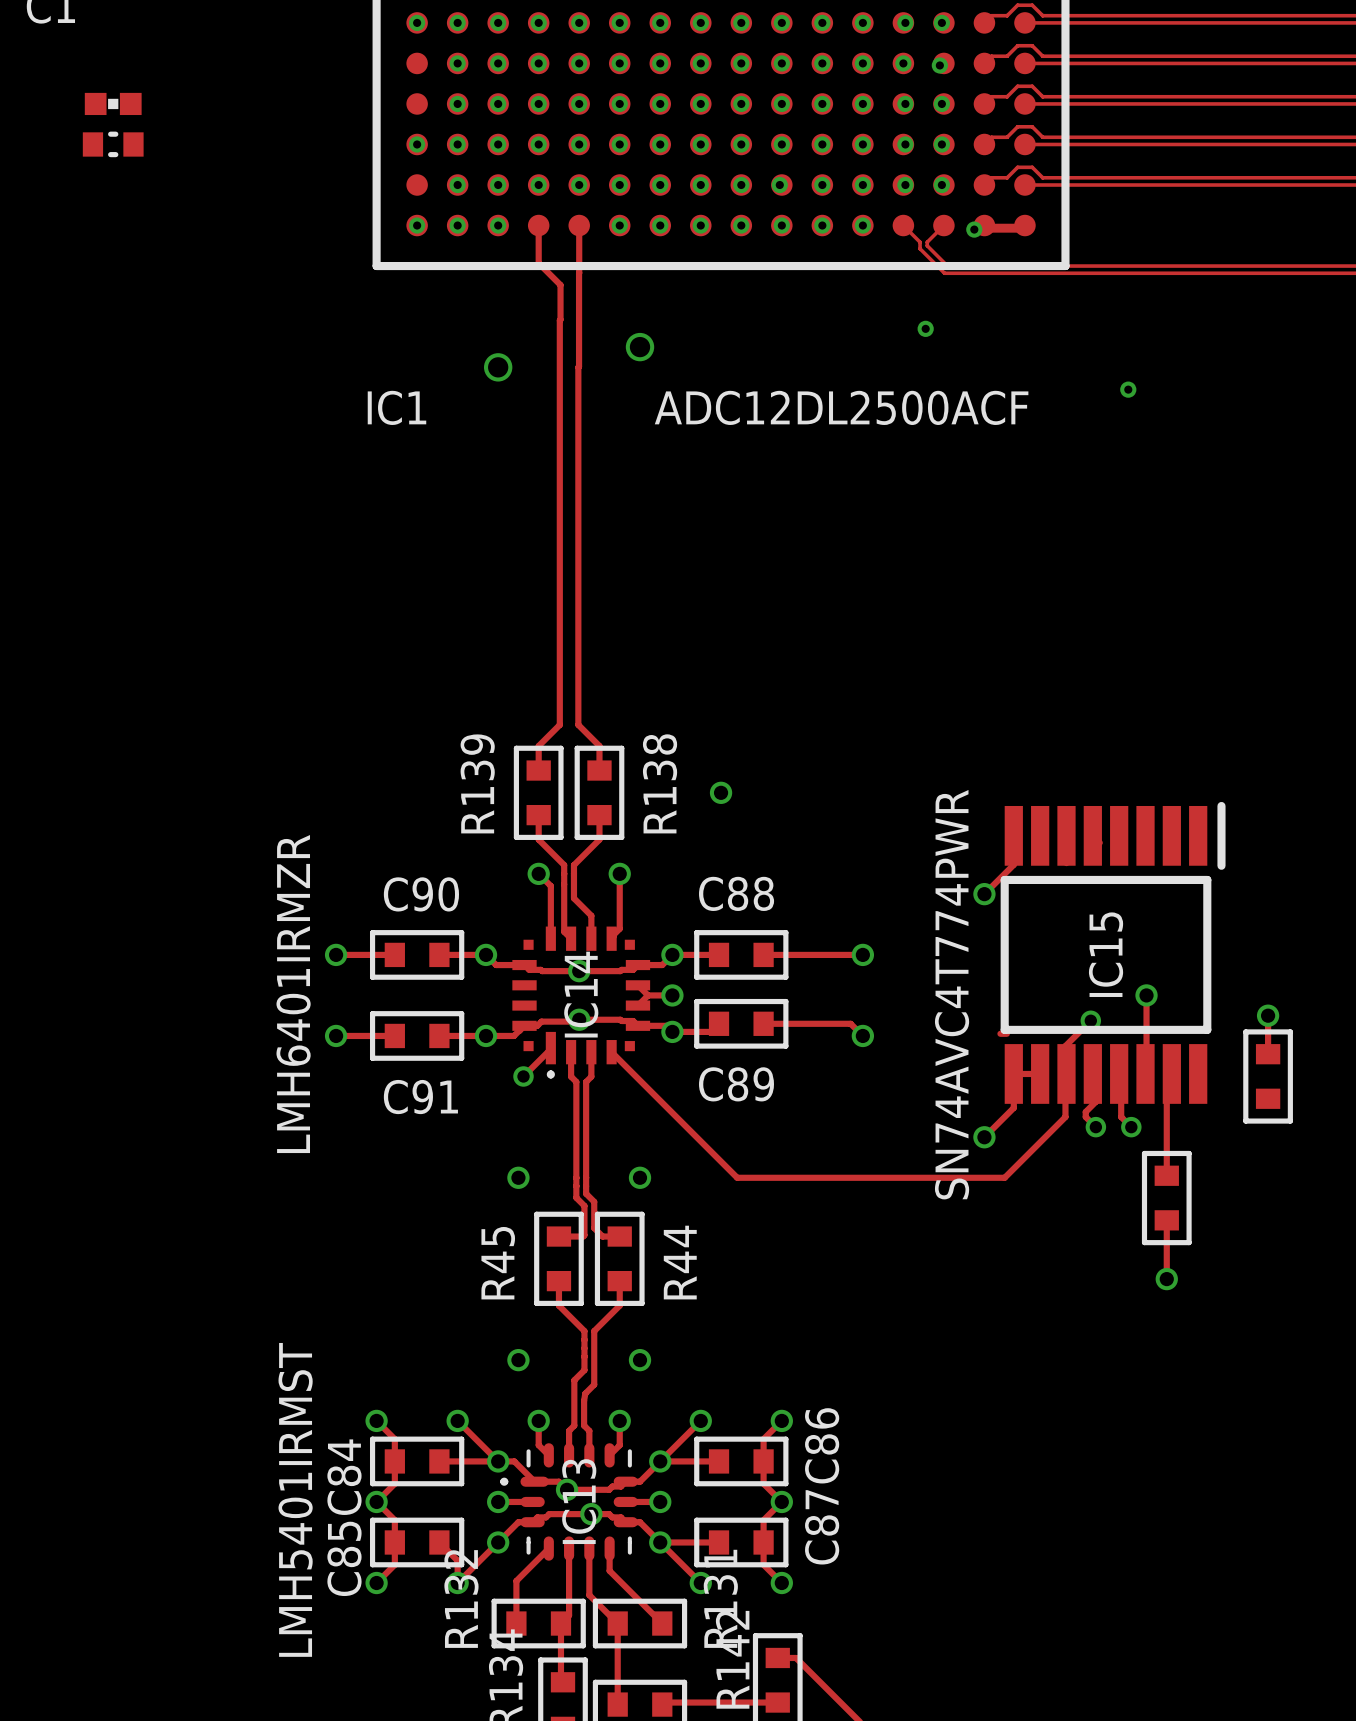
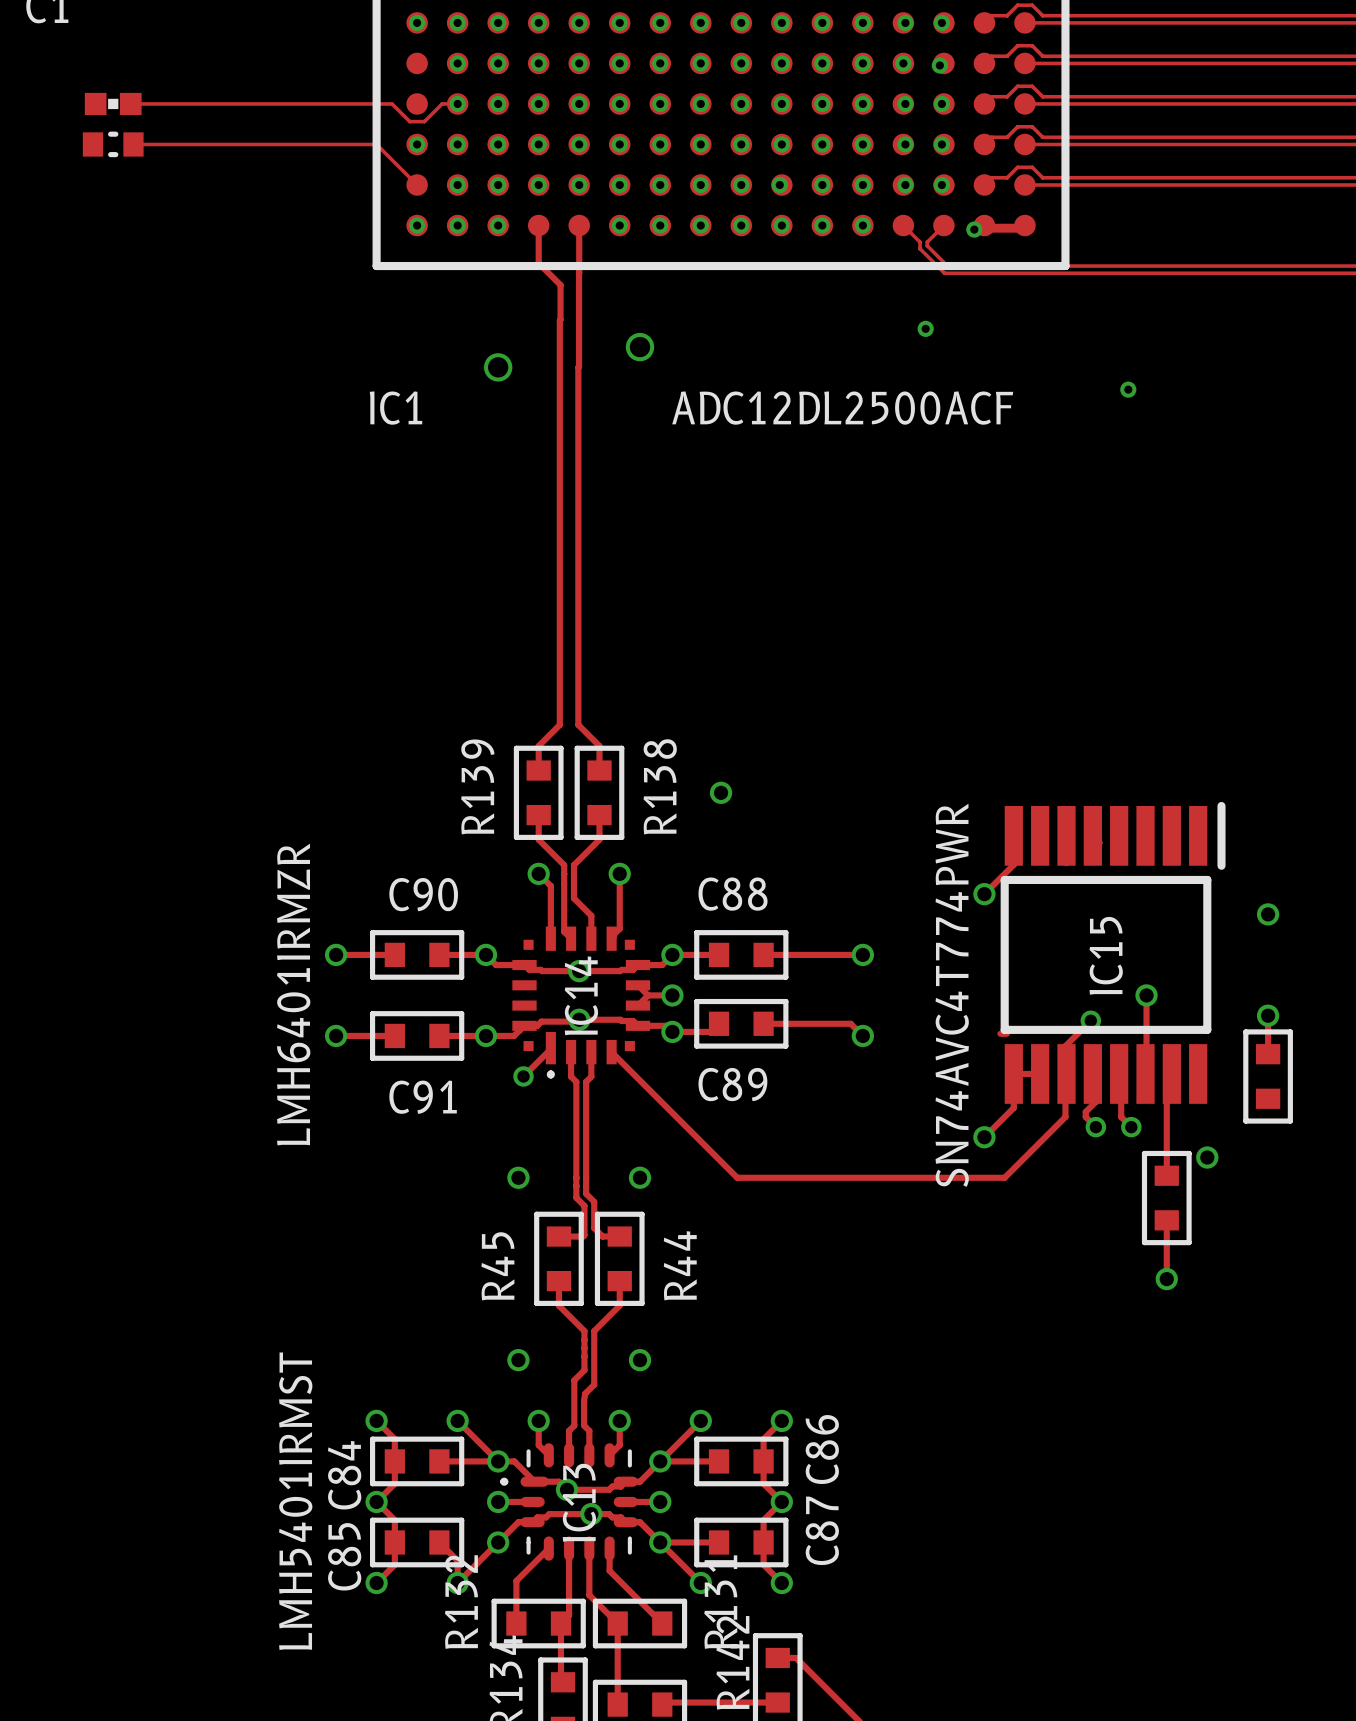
track: none -> (130, 103) (392, 103) (409, 121) (424, 121) (442, 103) (457, 103)
track: none -> (133, 144) (376, 144) (417, 185)
via: none -> (1268, 914)
via: none -> (1207, 1157)

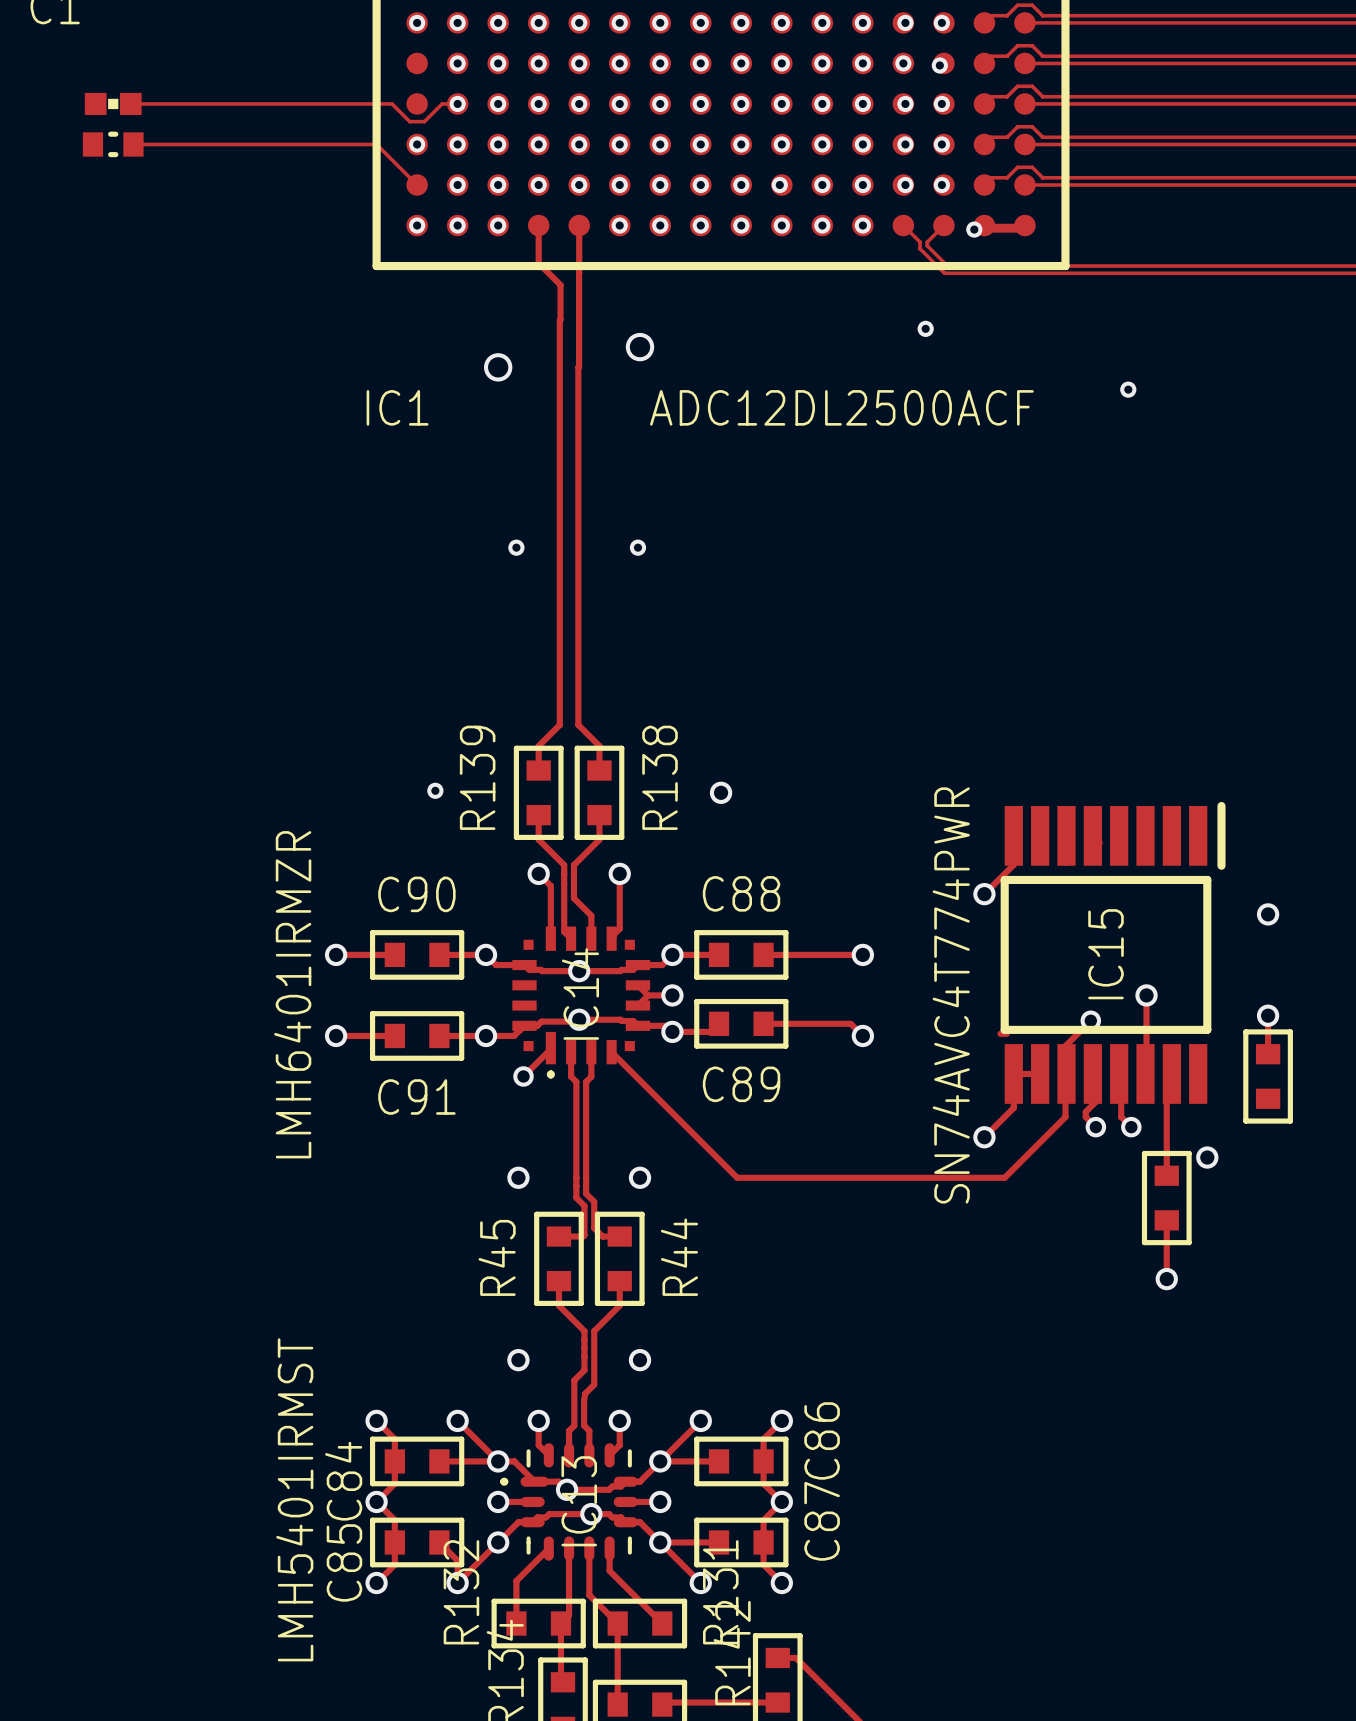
via: none -> (516, 547)
via: none -> (637, 547)
via: none -> (435, 790)

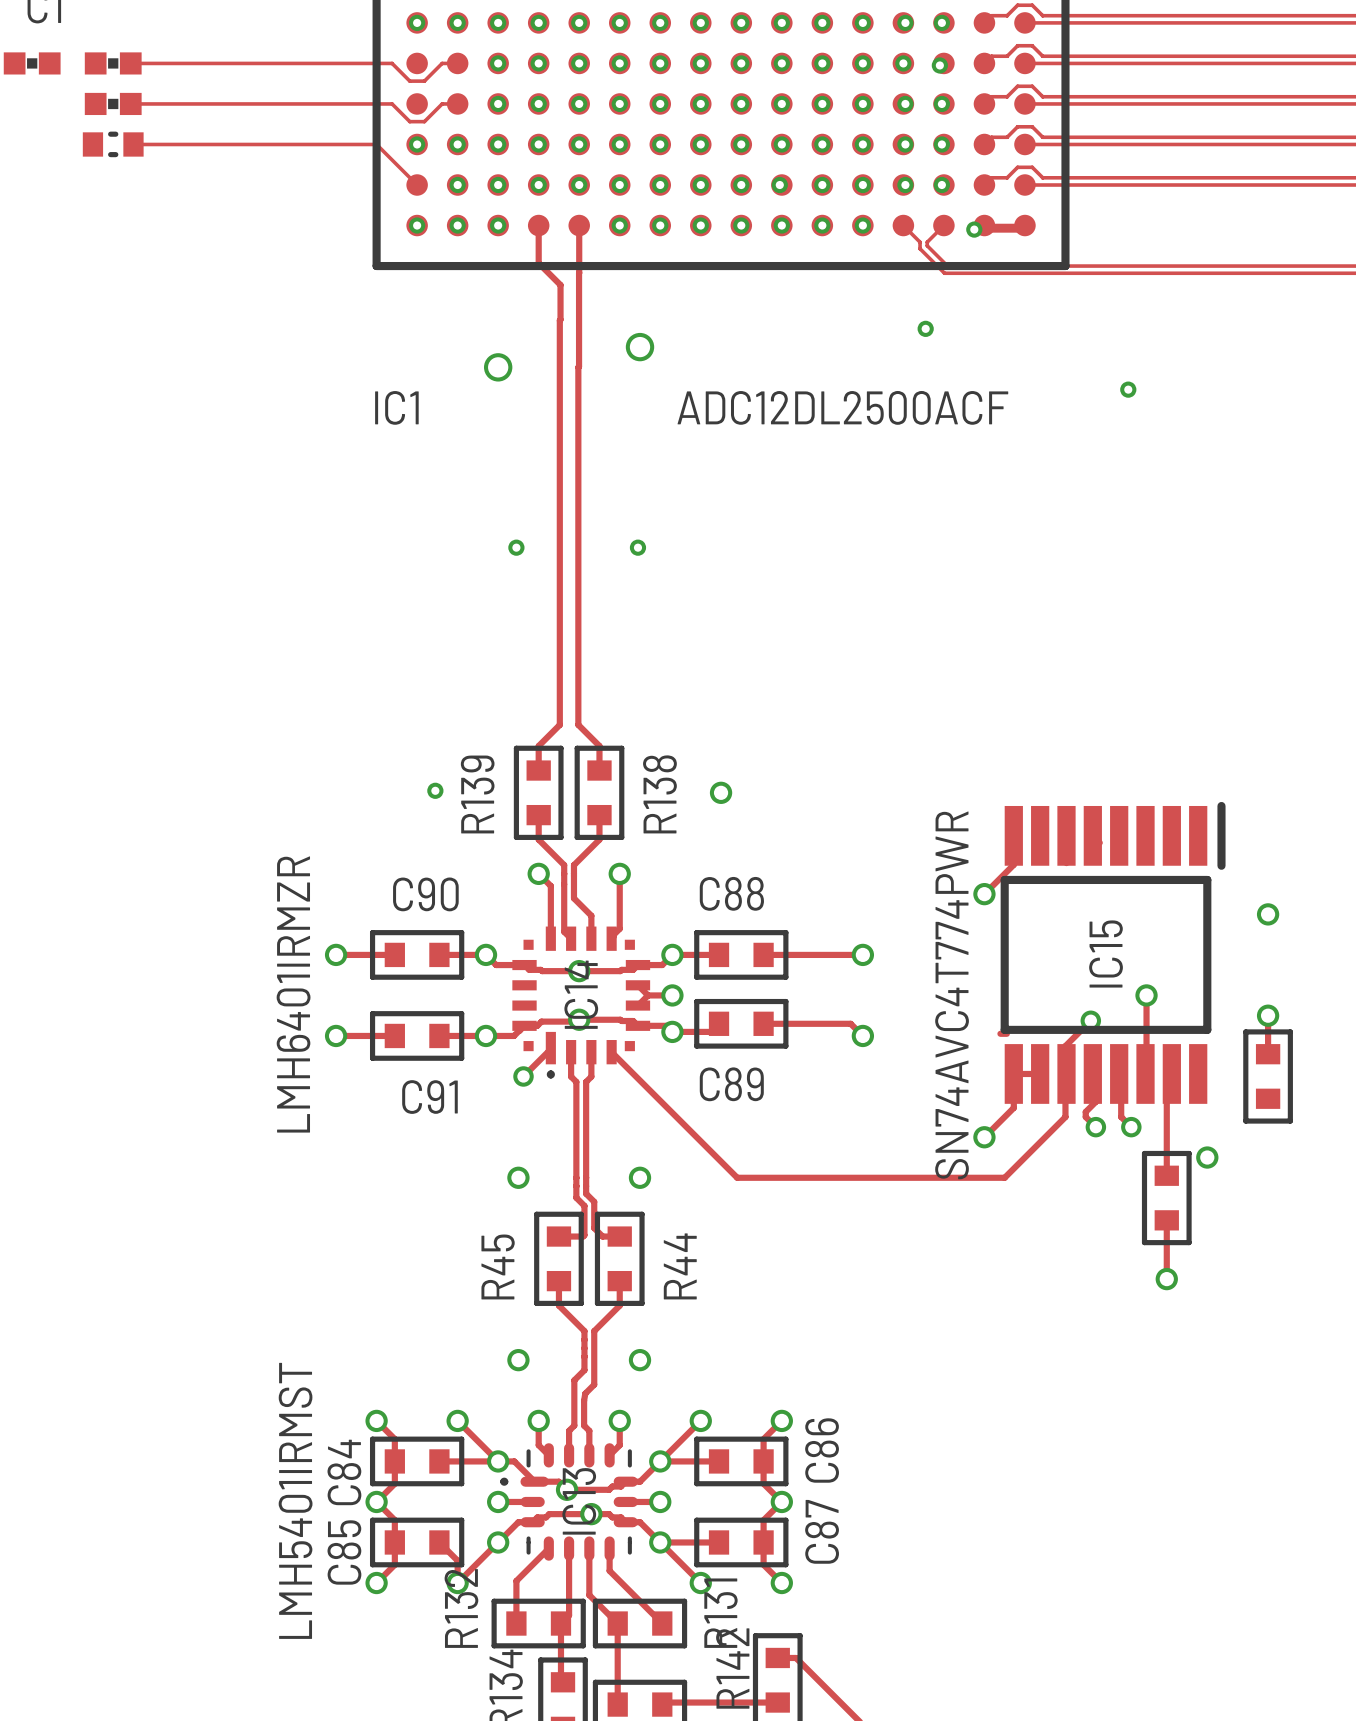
part: none -> (32, 63)
part: none -> (113, 63)
track: none -> (130, 63) (392, 63) (409, 81) (424, 81) (442, 63) (457, 63)
via: (457, 63) -> none
via: (457, 103) -> none

